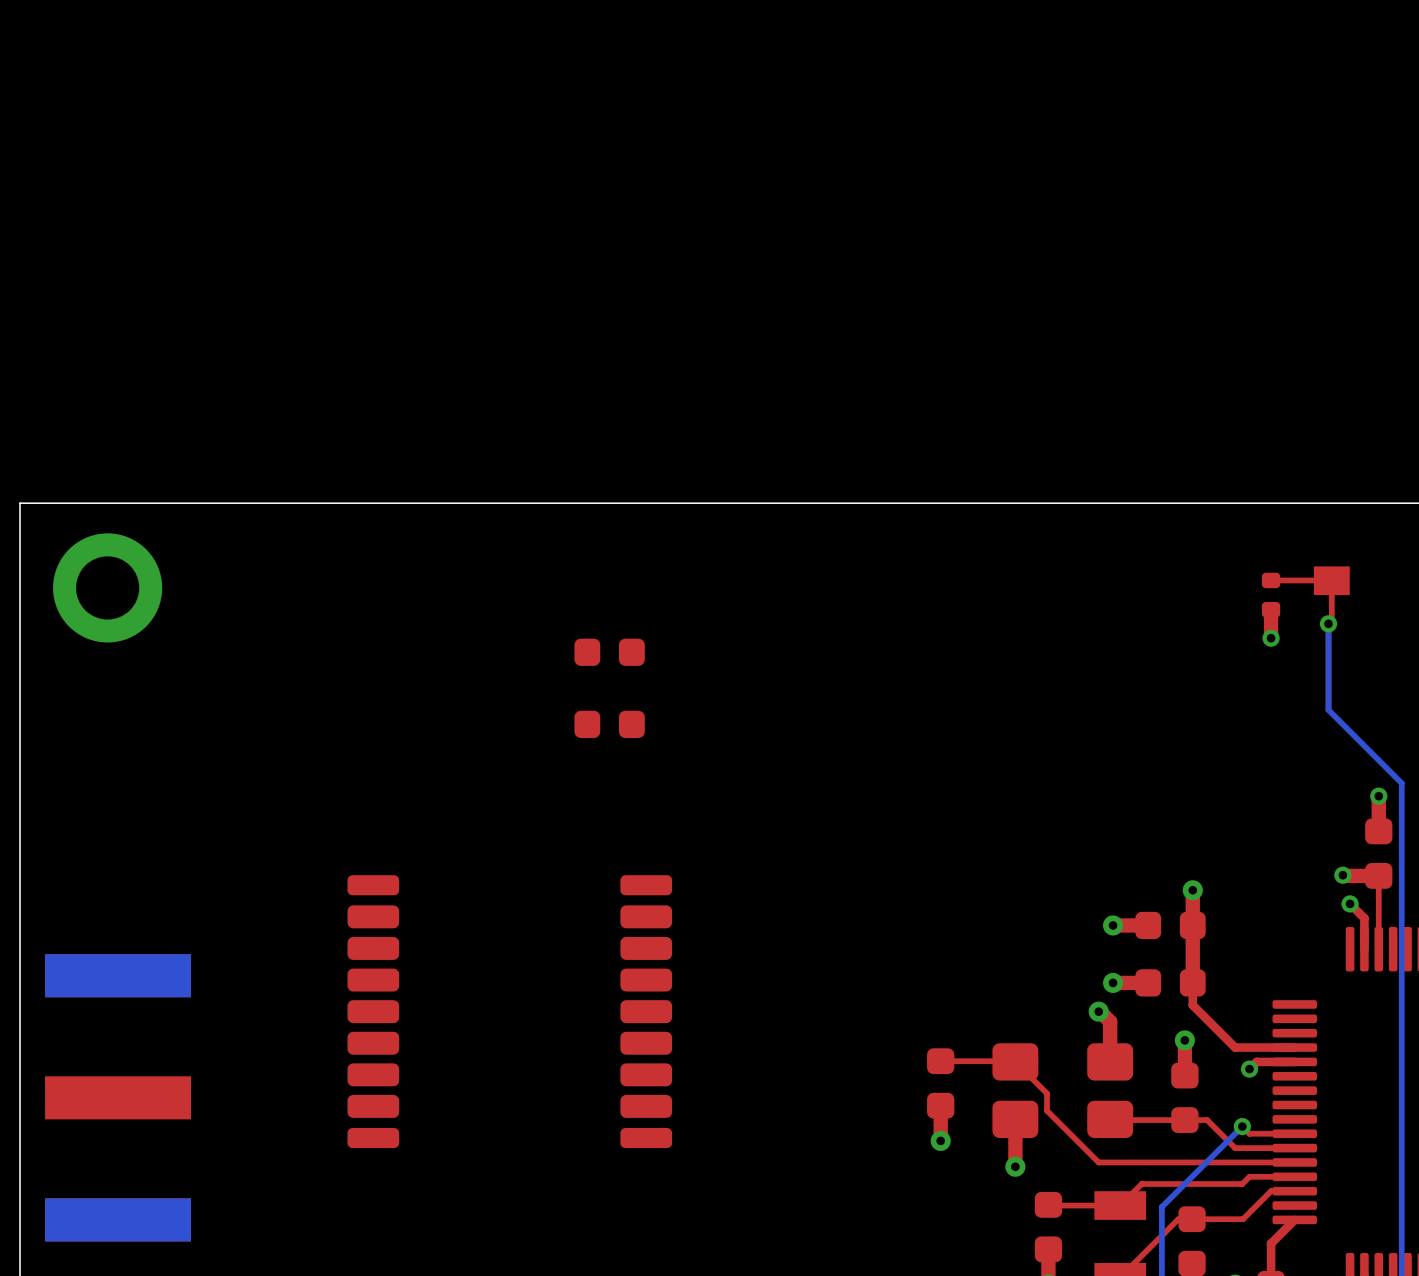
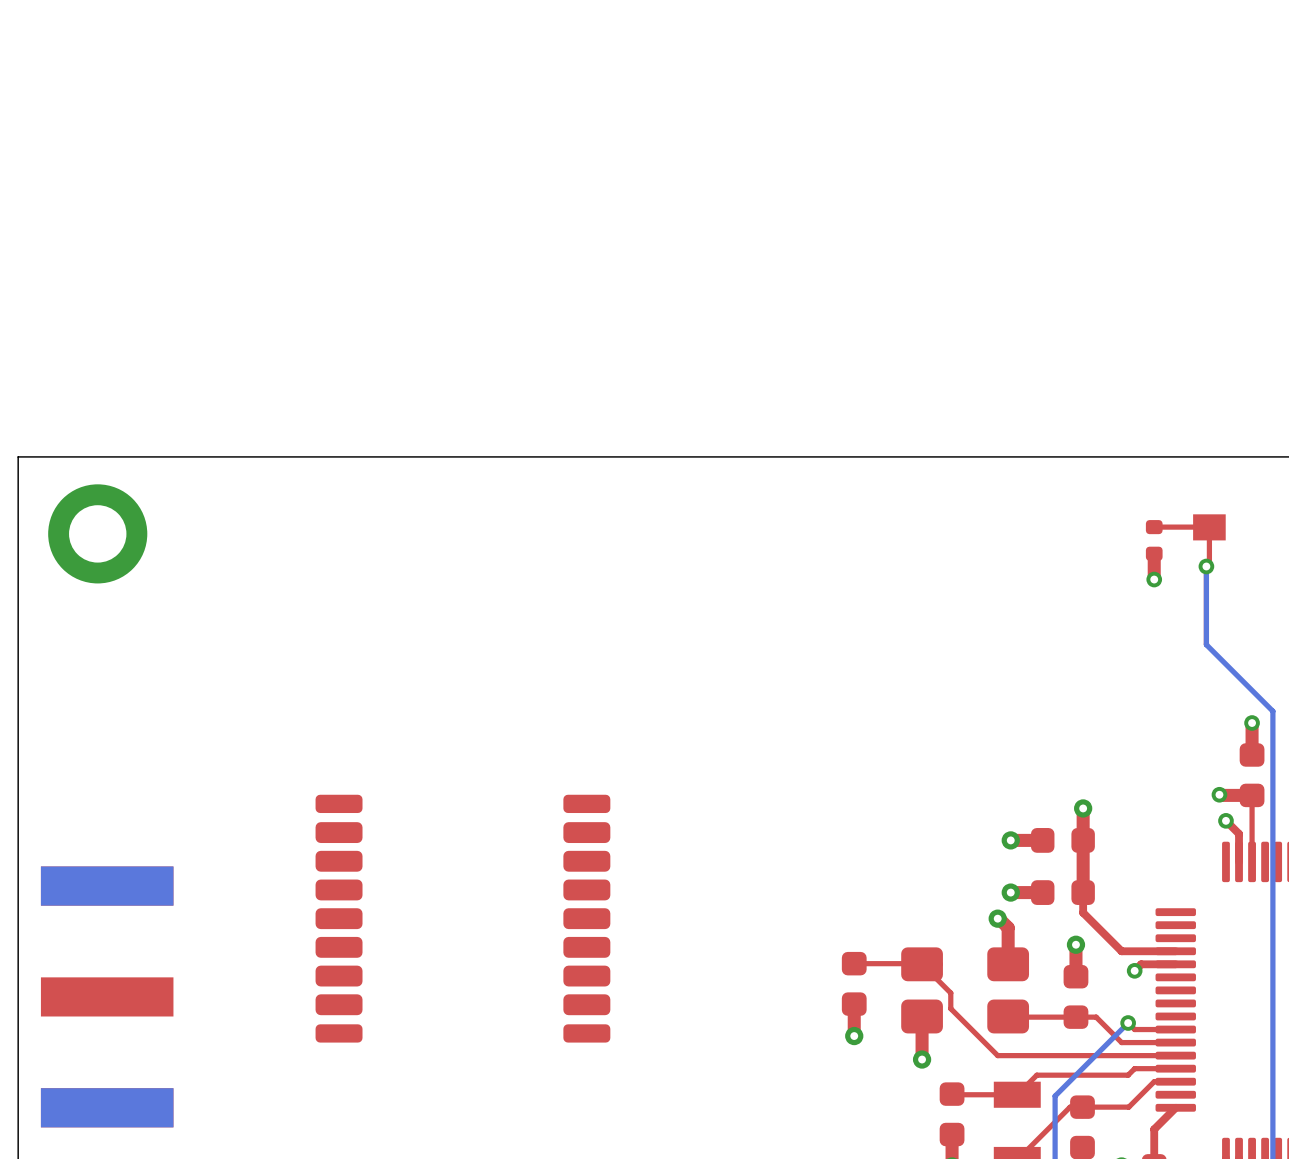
part: (609, 652) -> none
part: (609, 724) -> none

